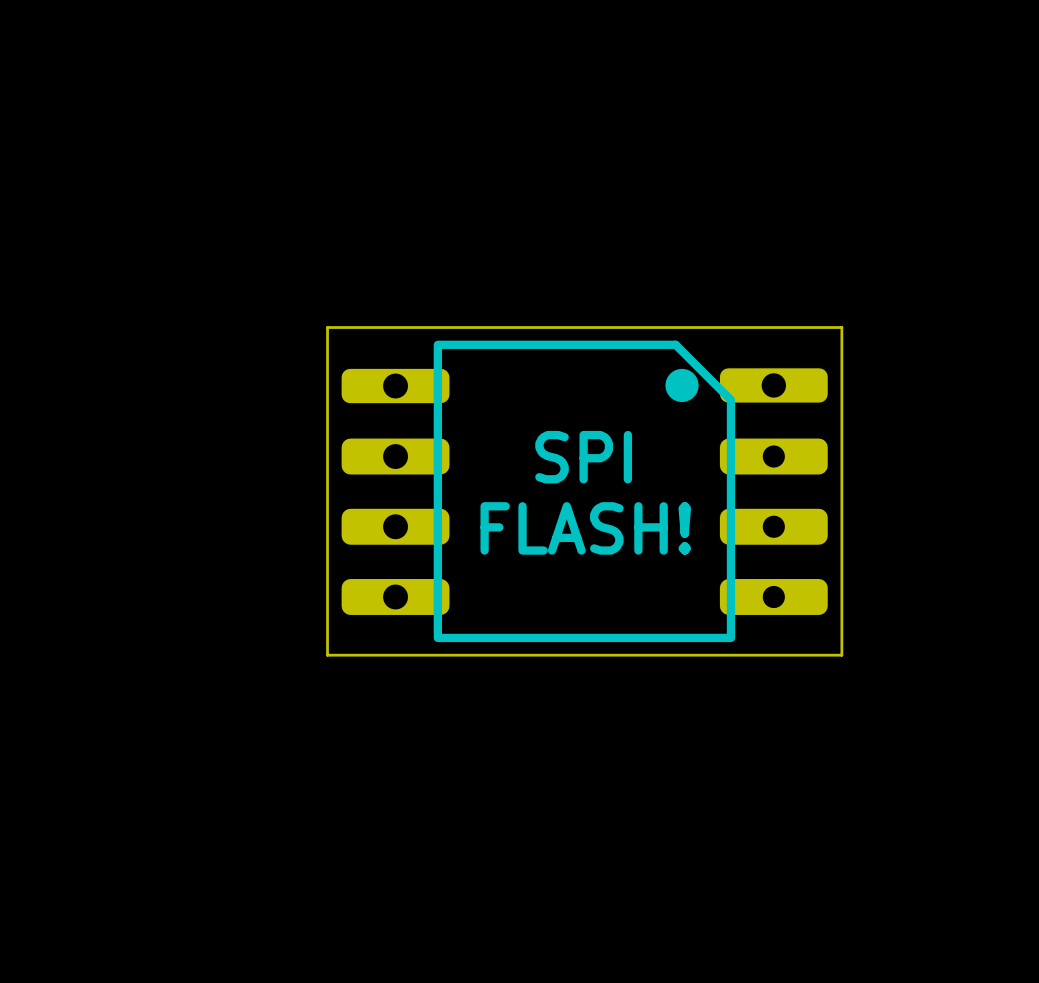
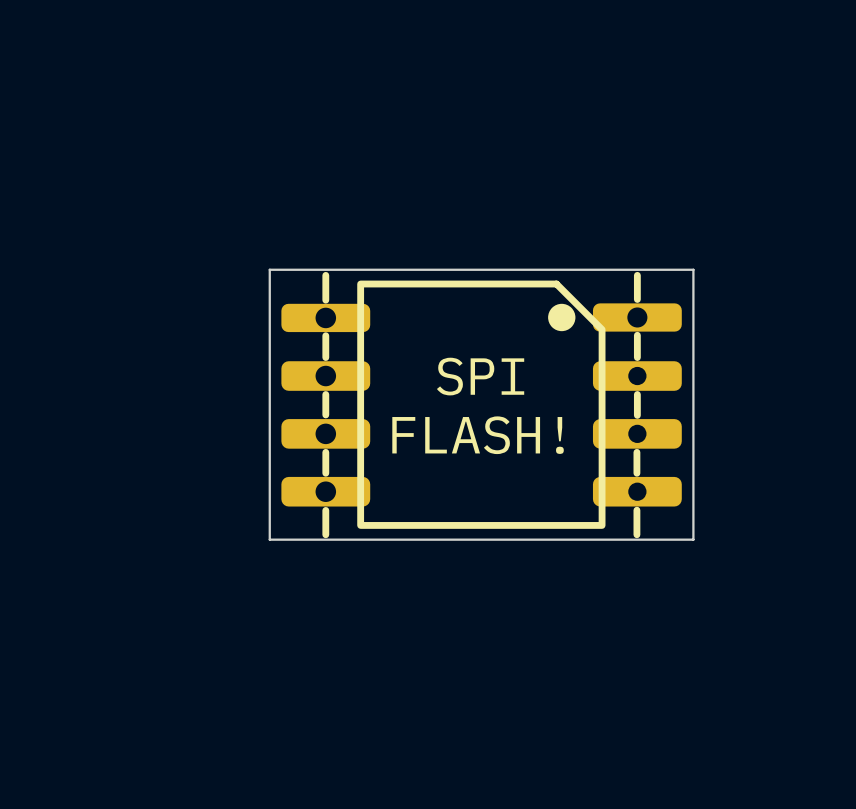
part footprint: [341, 340, 828, 643] -> [281, 271, 682, 539]

